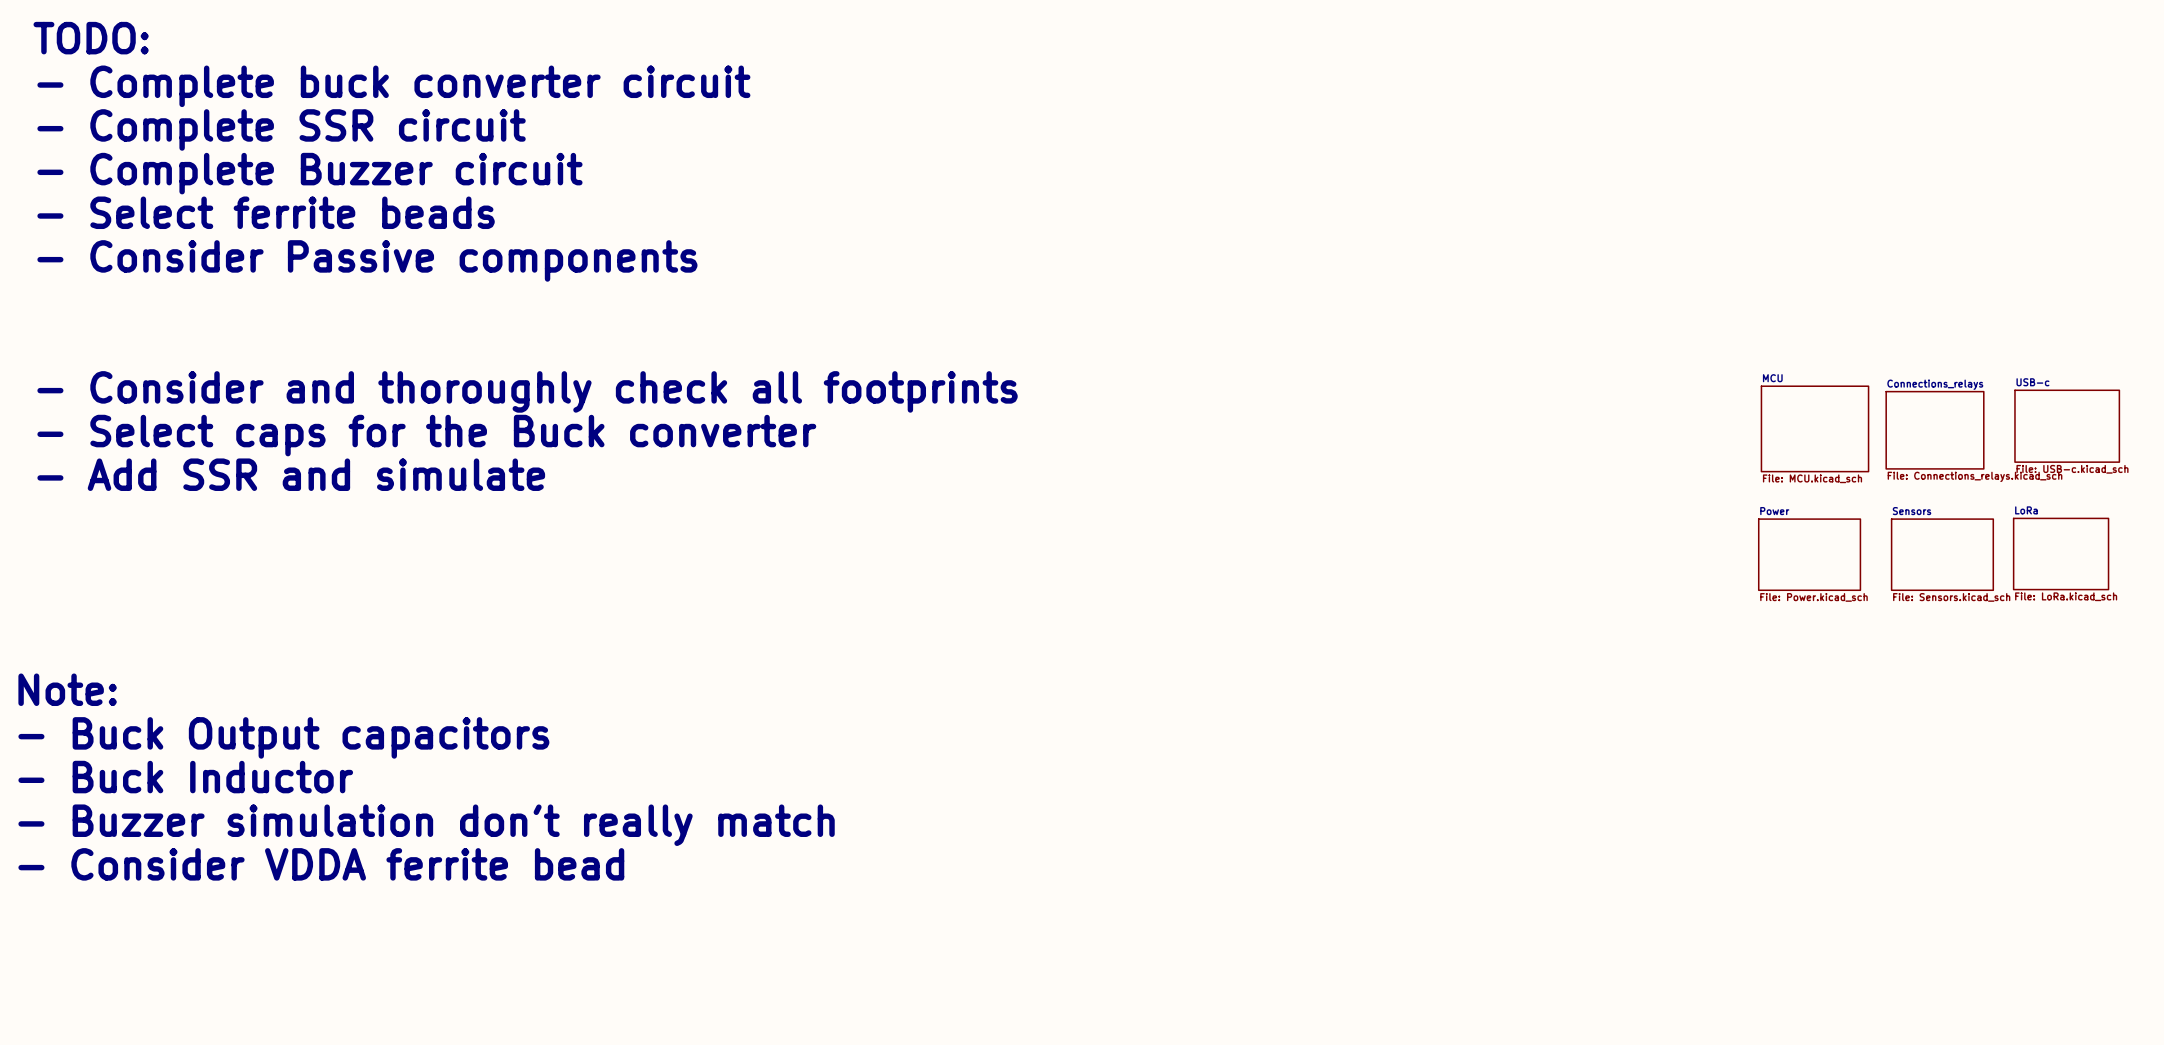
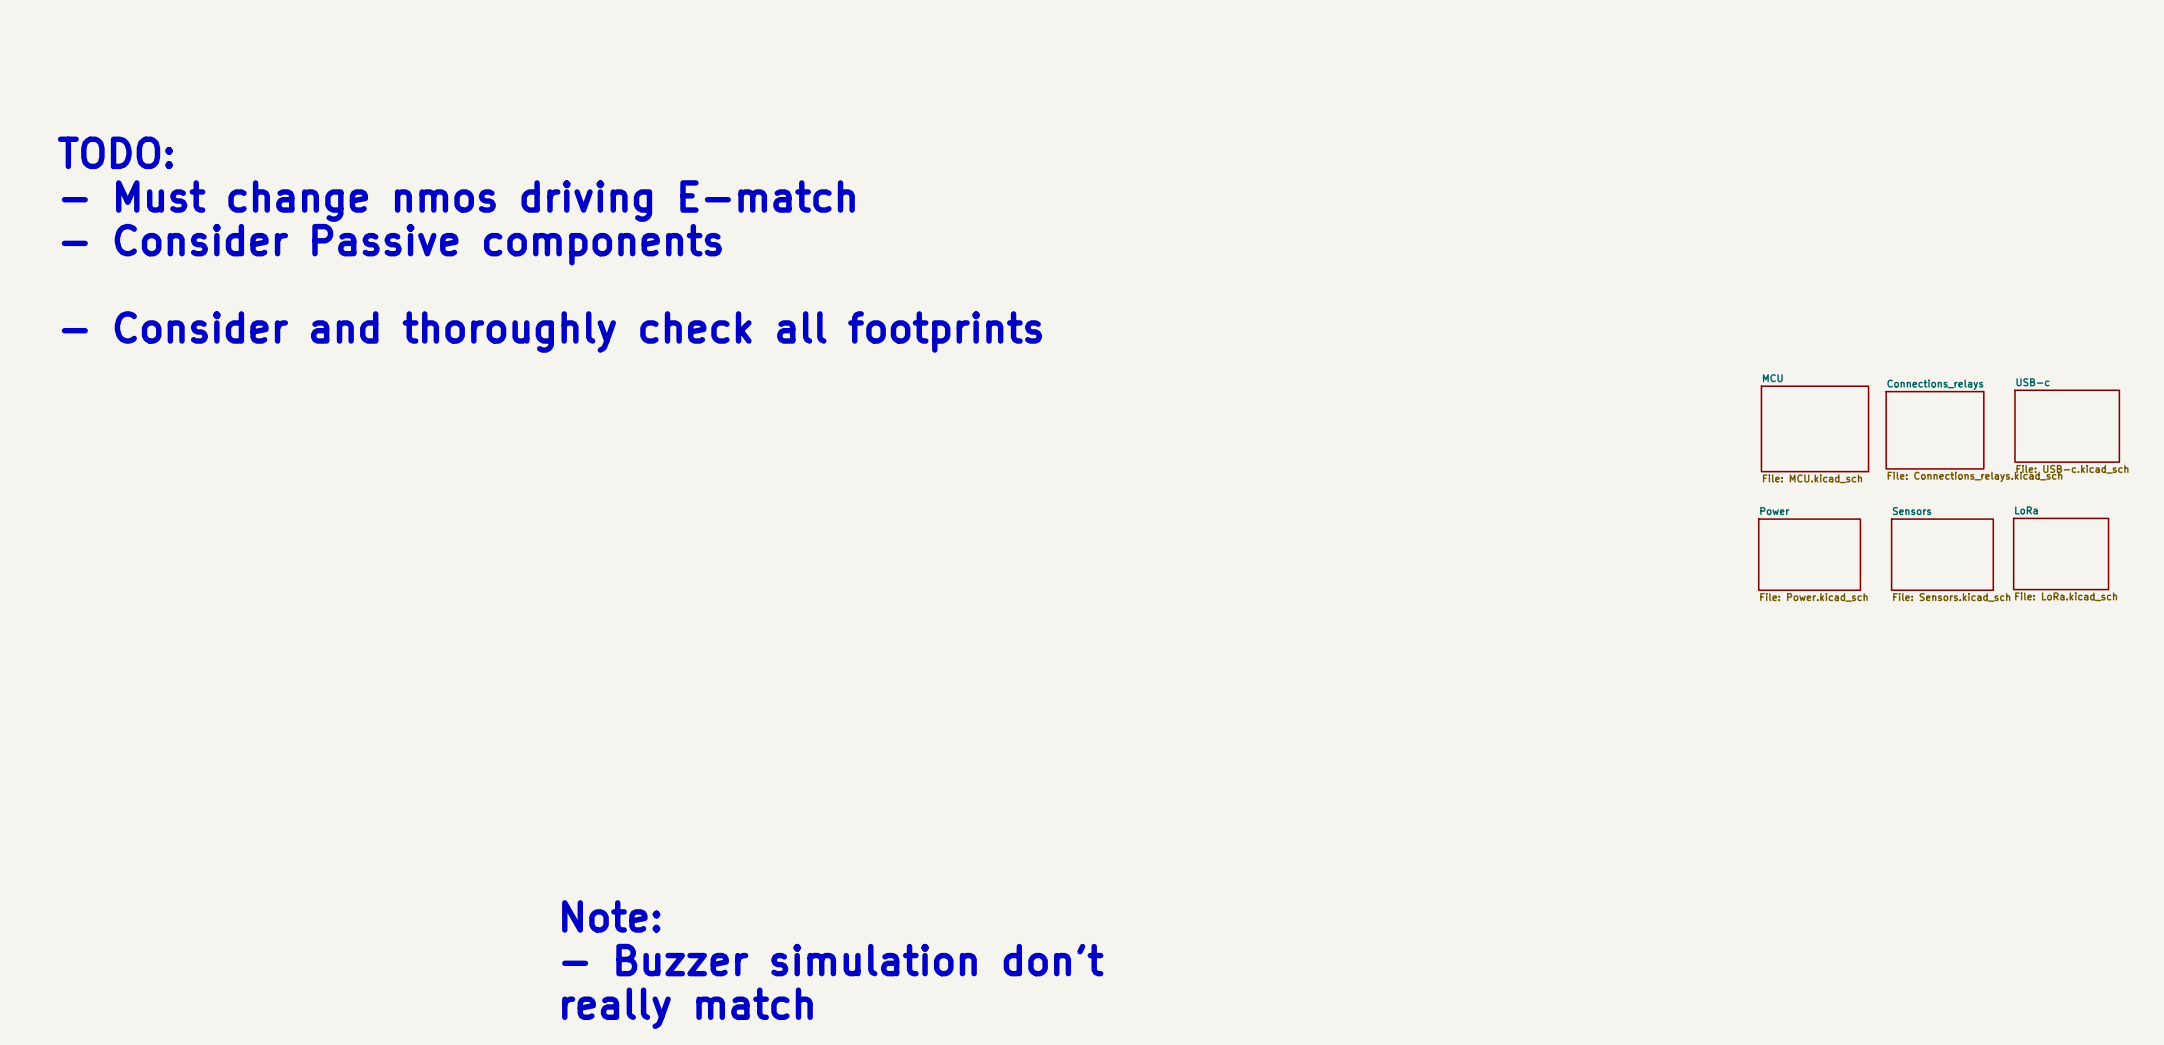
text position: TODO: (91, 38) -> TODO: (115, 152)
text: - Complete buck converter circuit (393, 86) -> none
text: - Complete SSR circuit (281, 129) -> none
text: - Complete Buzzer circuit (309, 173) -> none
text: none -> - Must change nmos driving E-match (458, 201)
text: - Select ferrite beads (266, 212) -> none
text position: - Consider Passive components (367, 260) -> - Consider Passive components (391, 244)
text position: - Consider and thoroughly check all footprints (527, 391) -> - Consider and thoroughly check all footprints (551, 331)
text: - Select caps for the Buck converter (426, 435) -> none
text: - Add SSR and simulate (291, 474) -> none
text: Note: (67, 689) -> none
text: - Buck Output capacitors (283, 737) -> none
text: - Buck Inductor (185, 777) -> none
text: - Buzzer simulation don't really match (426, 825) -> none
text: - Consider VDDA ferrite bead (321, 864) -> none
text: none -> Note: (611, 916)
text: none -> - Buzzer simulation don't (832, 960)
text: none -> really match (687, 1008)

